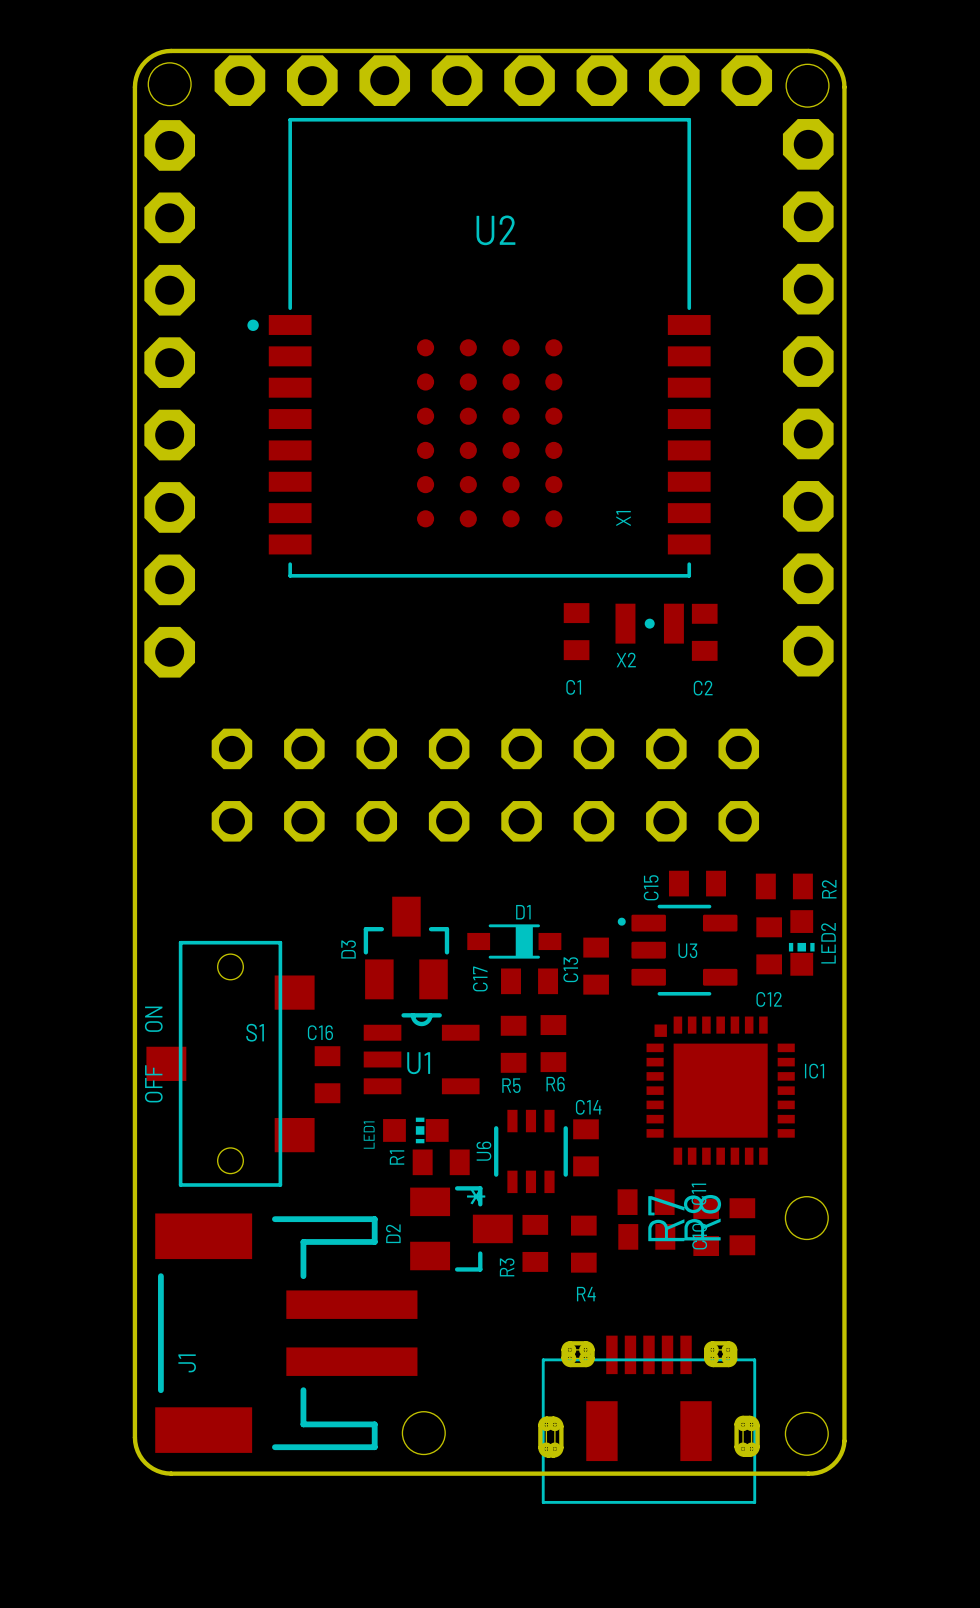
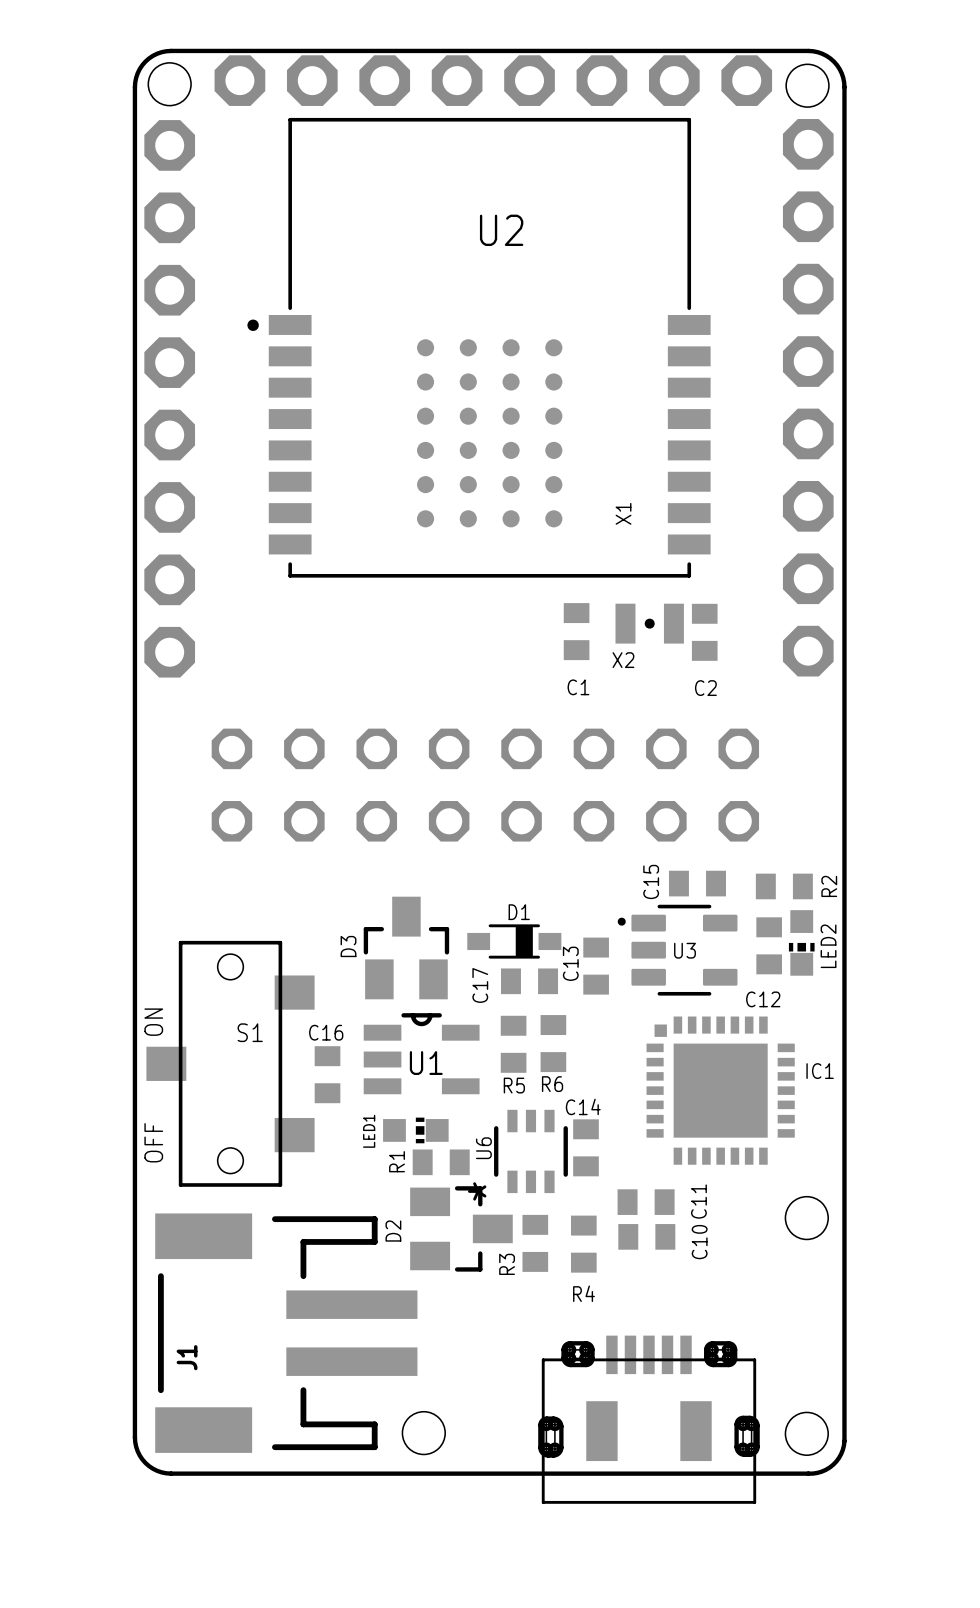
R8: (742, 1226) -> none
R7: (706, 1227) -> none

